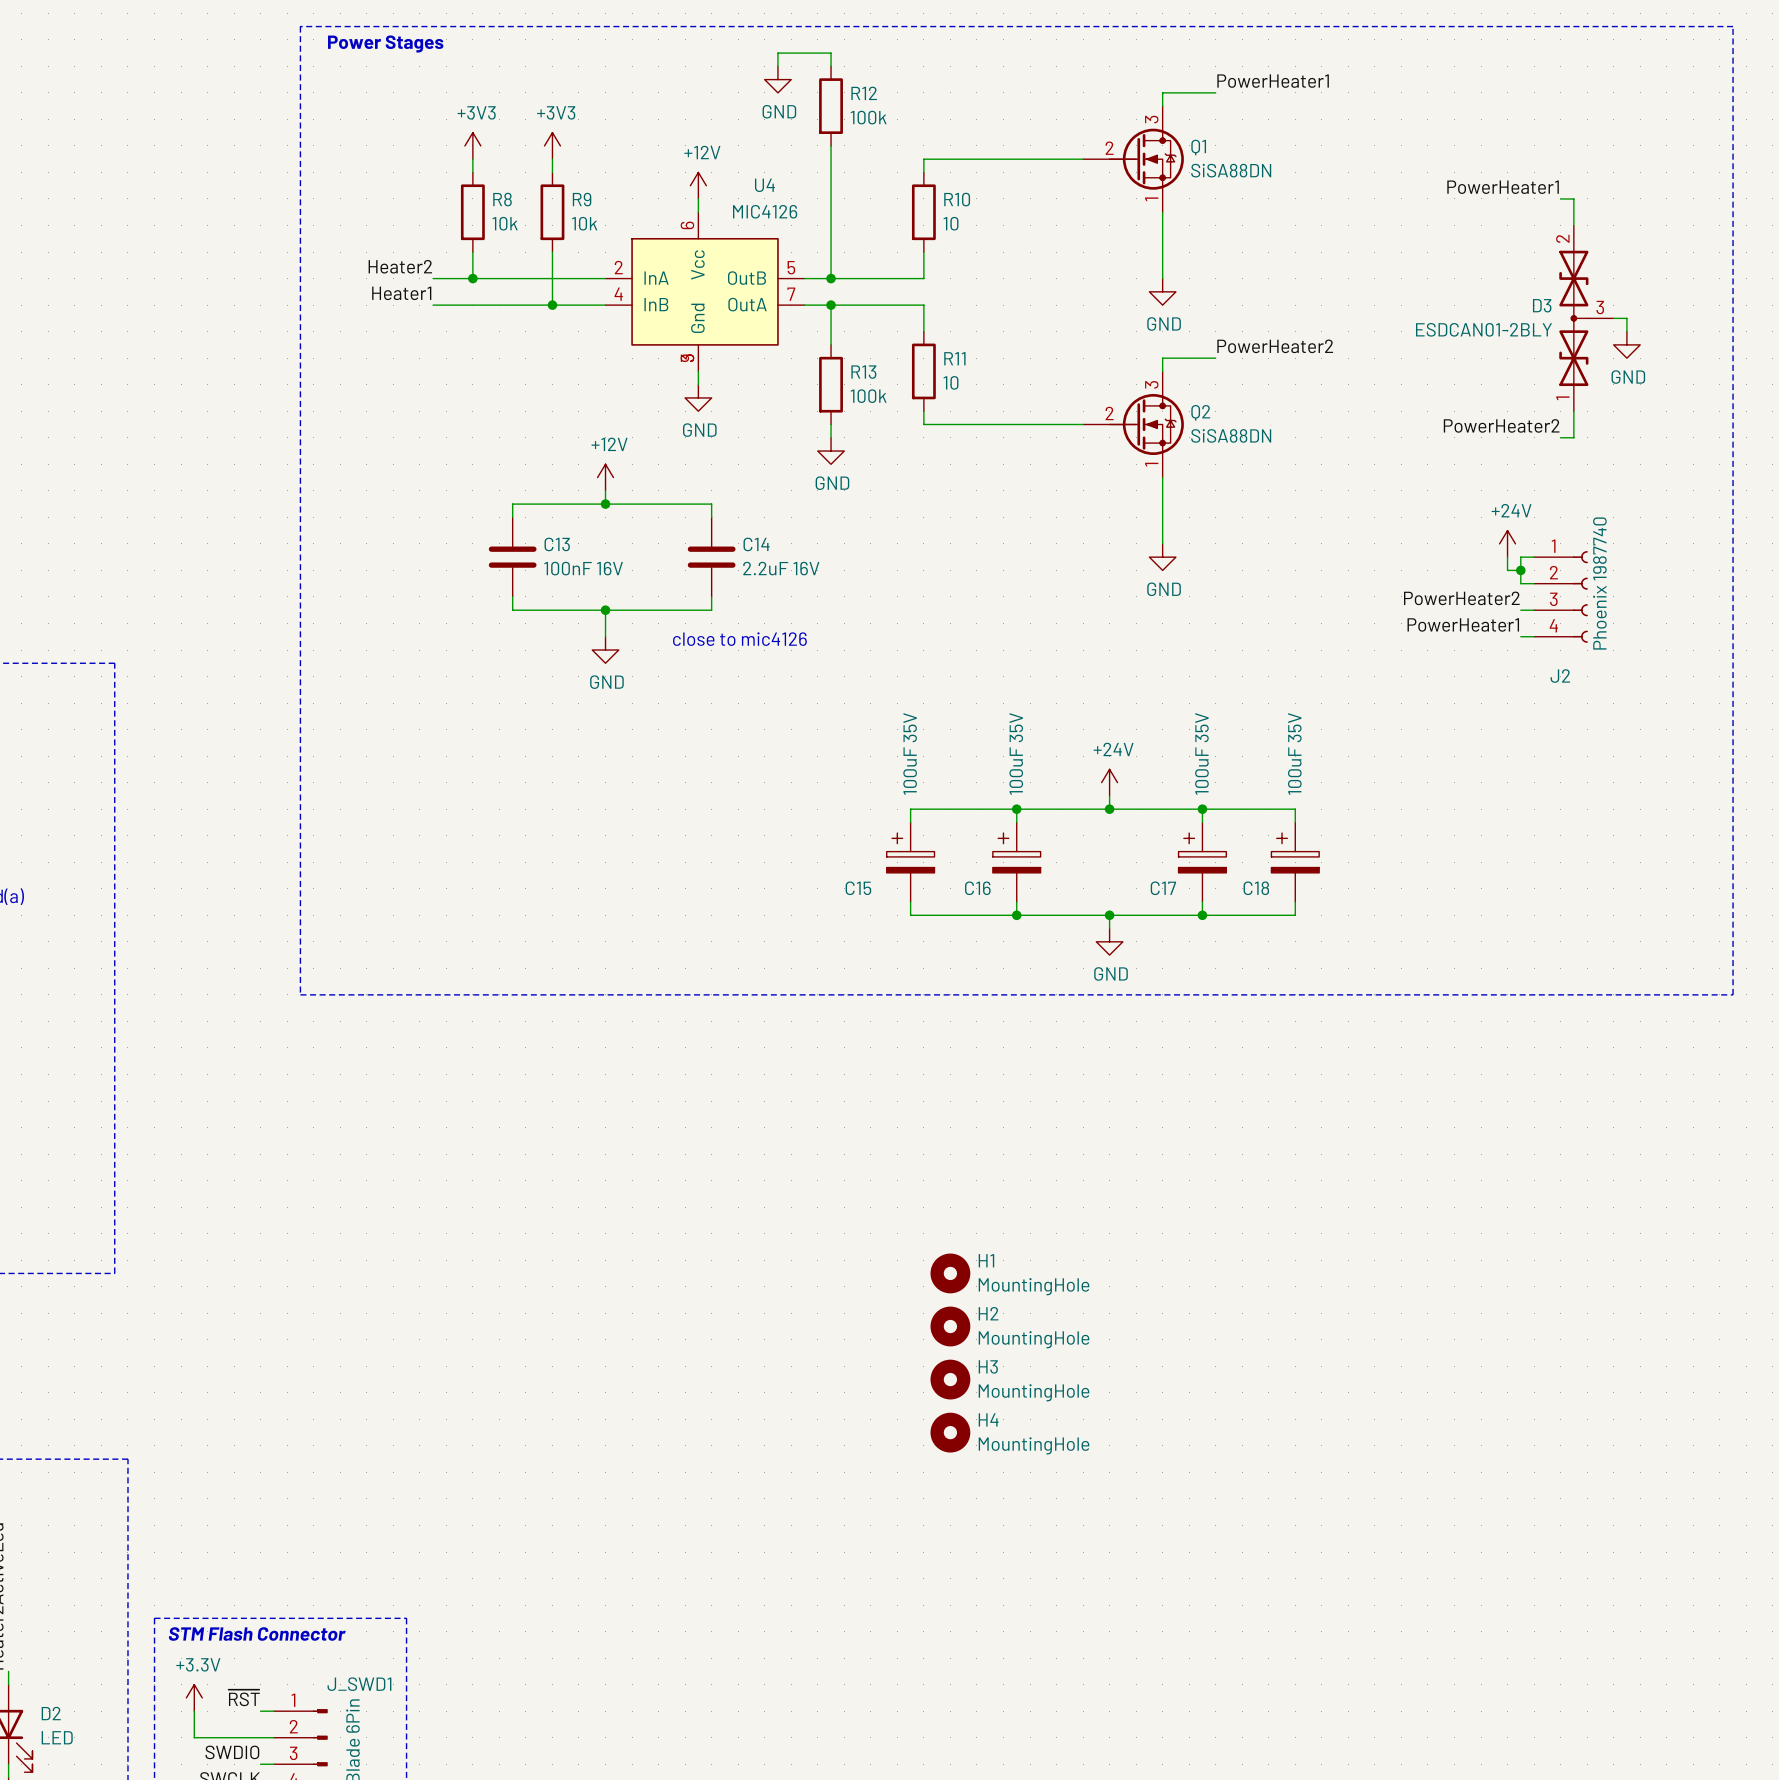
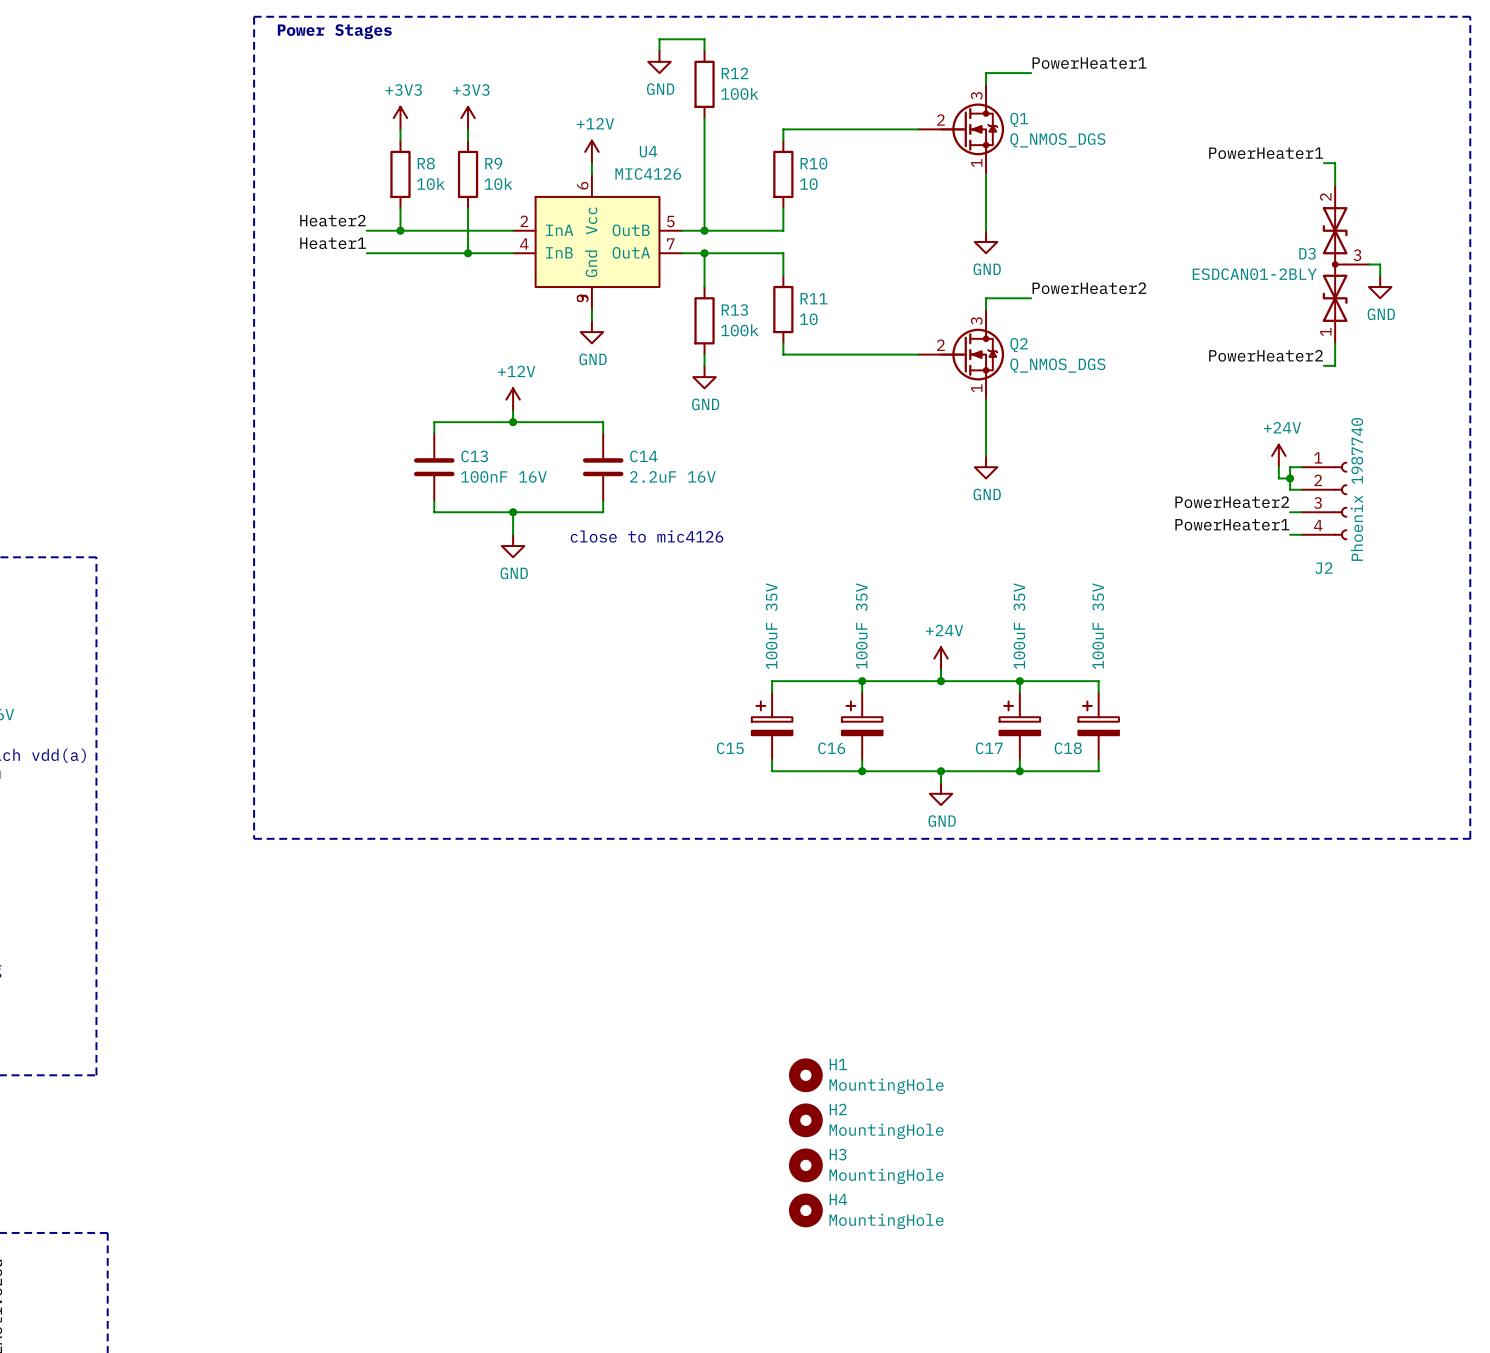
Q1 value: SiSA88DN (1231, 170) -> Q_NMOS_DGS (1057, 140)
Q2 value: SiSA88DN (1231, 435) -> Q_NMOS_DGS (1057, 365)

